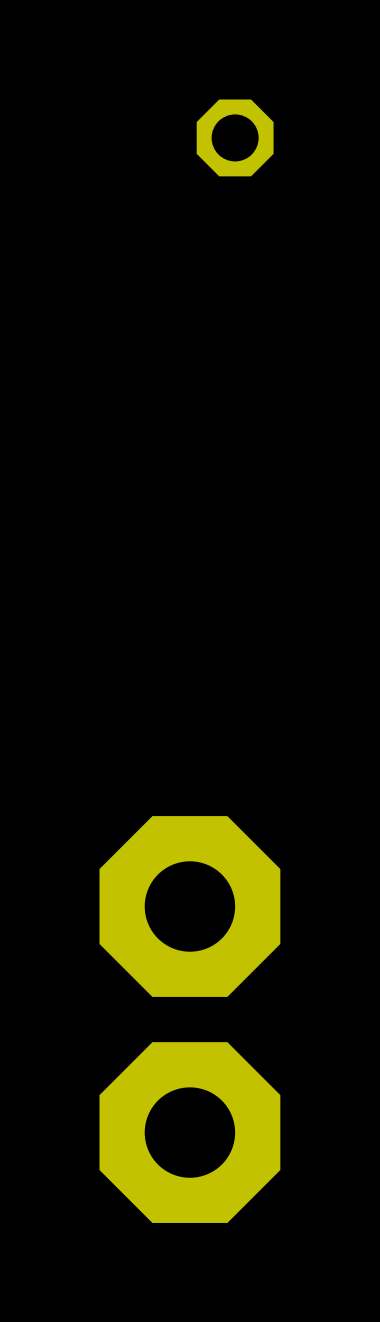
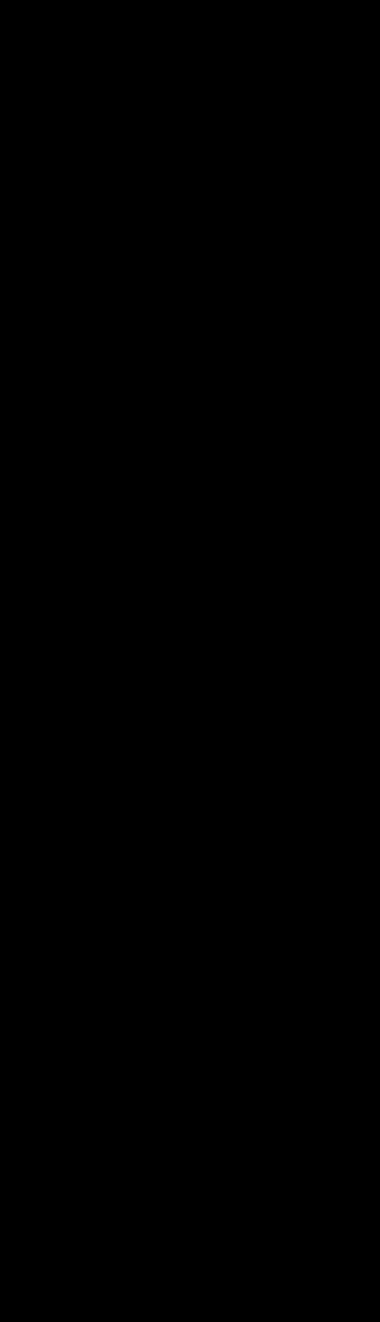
part: (235, 137) -> none
part: (189, 906) -> none
part: (189, 1132) -> none

